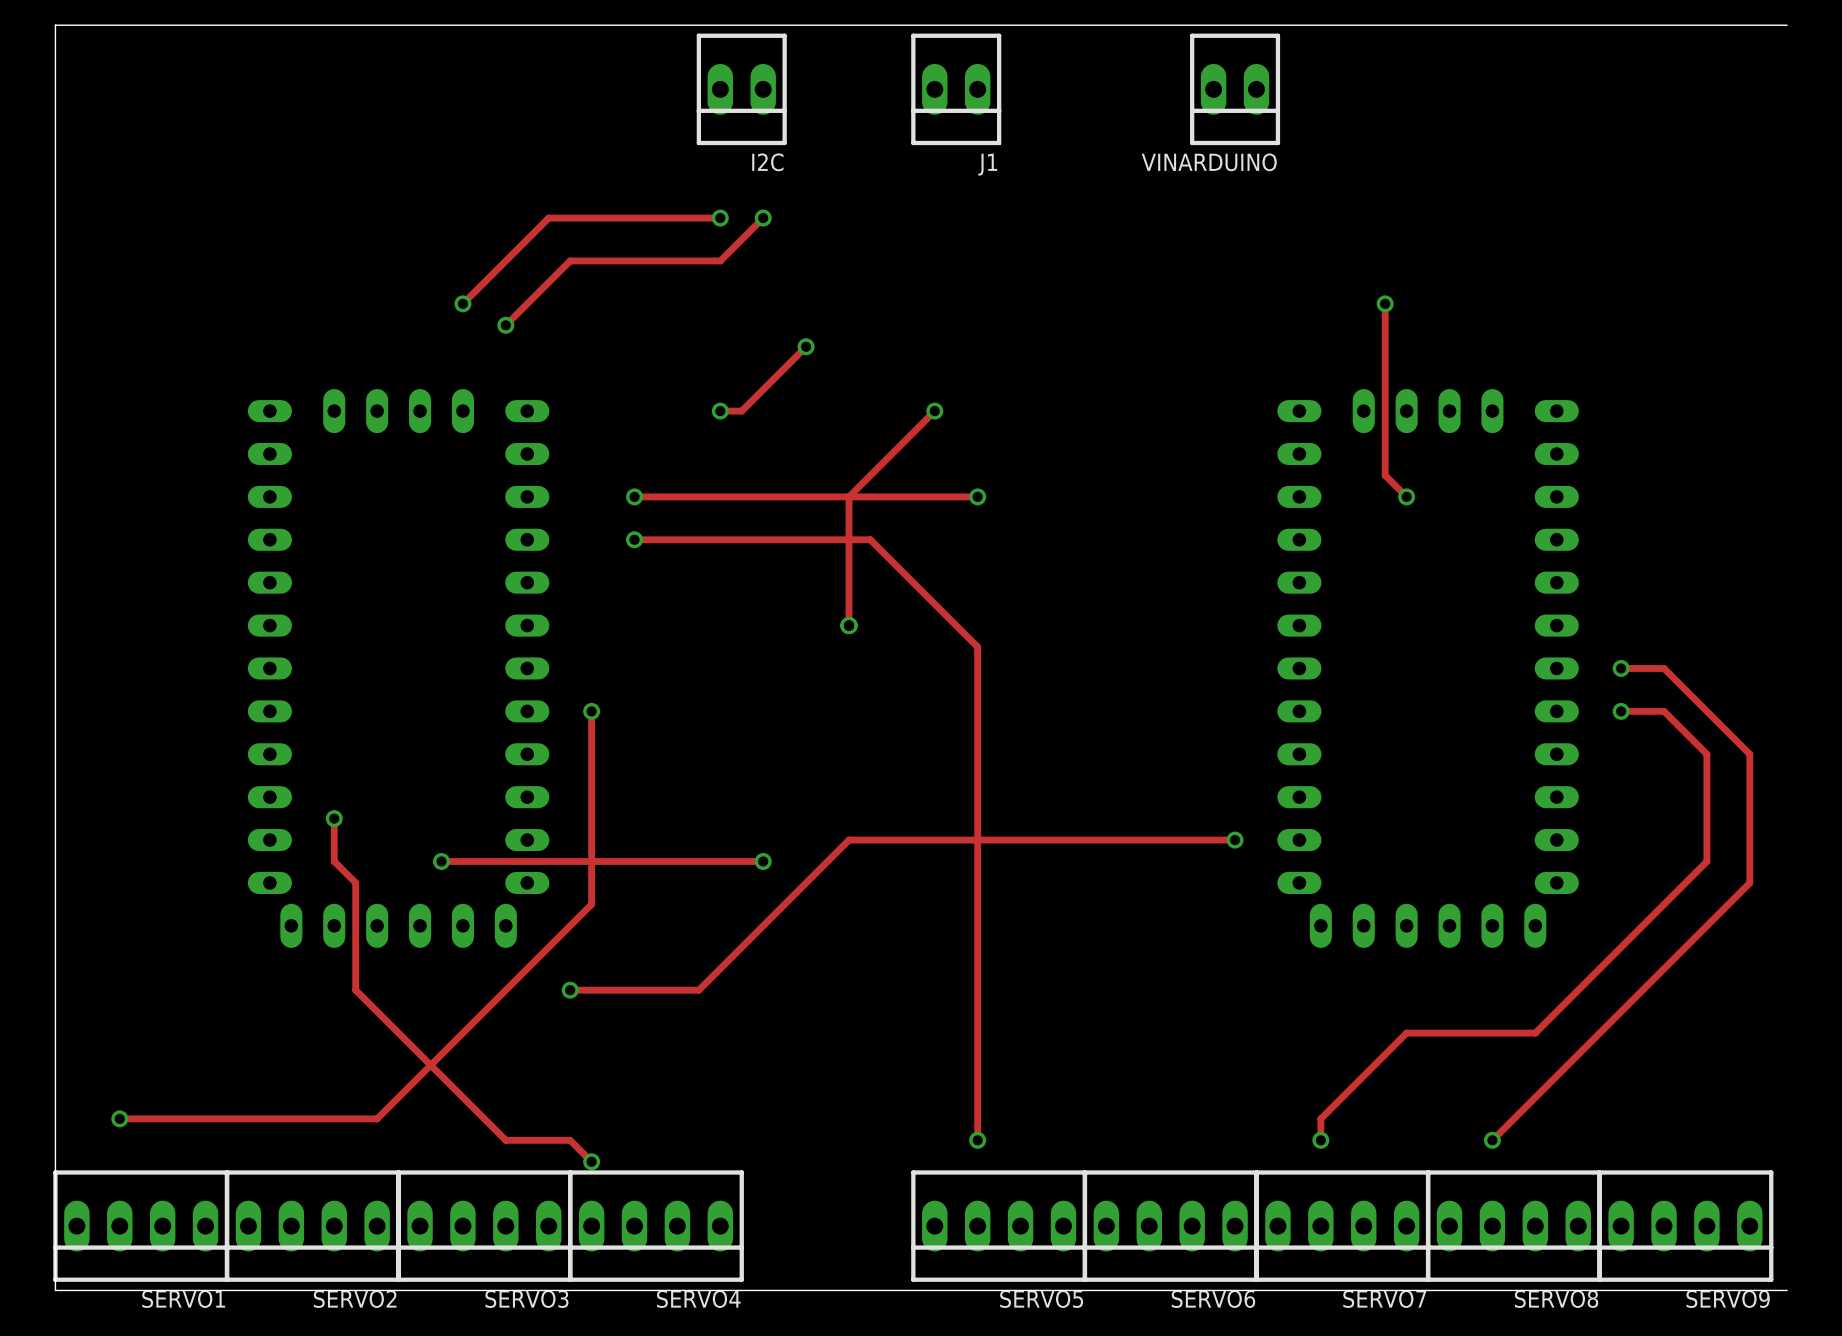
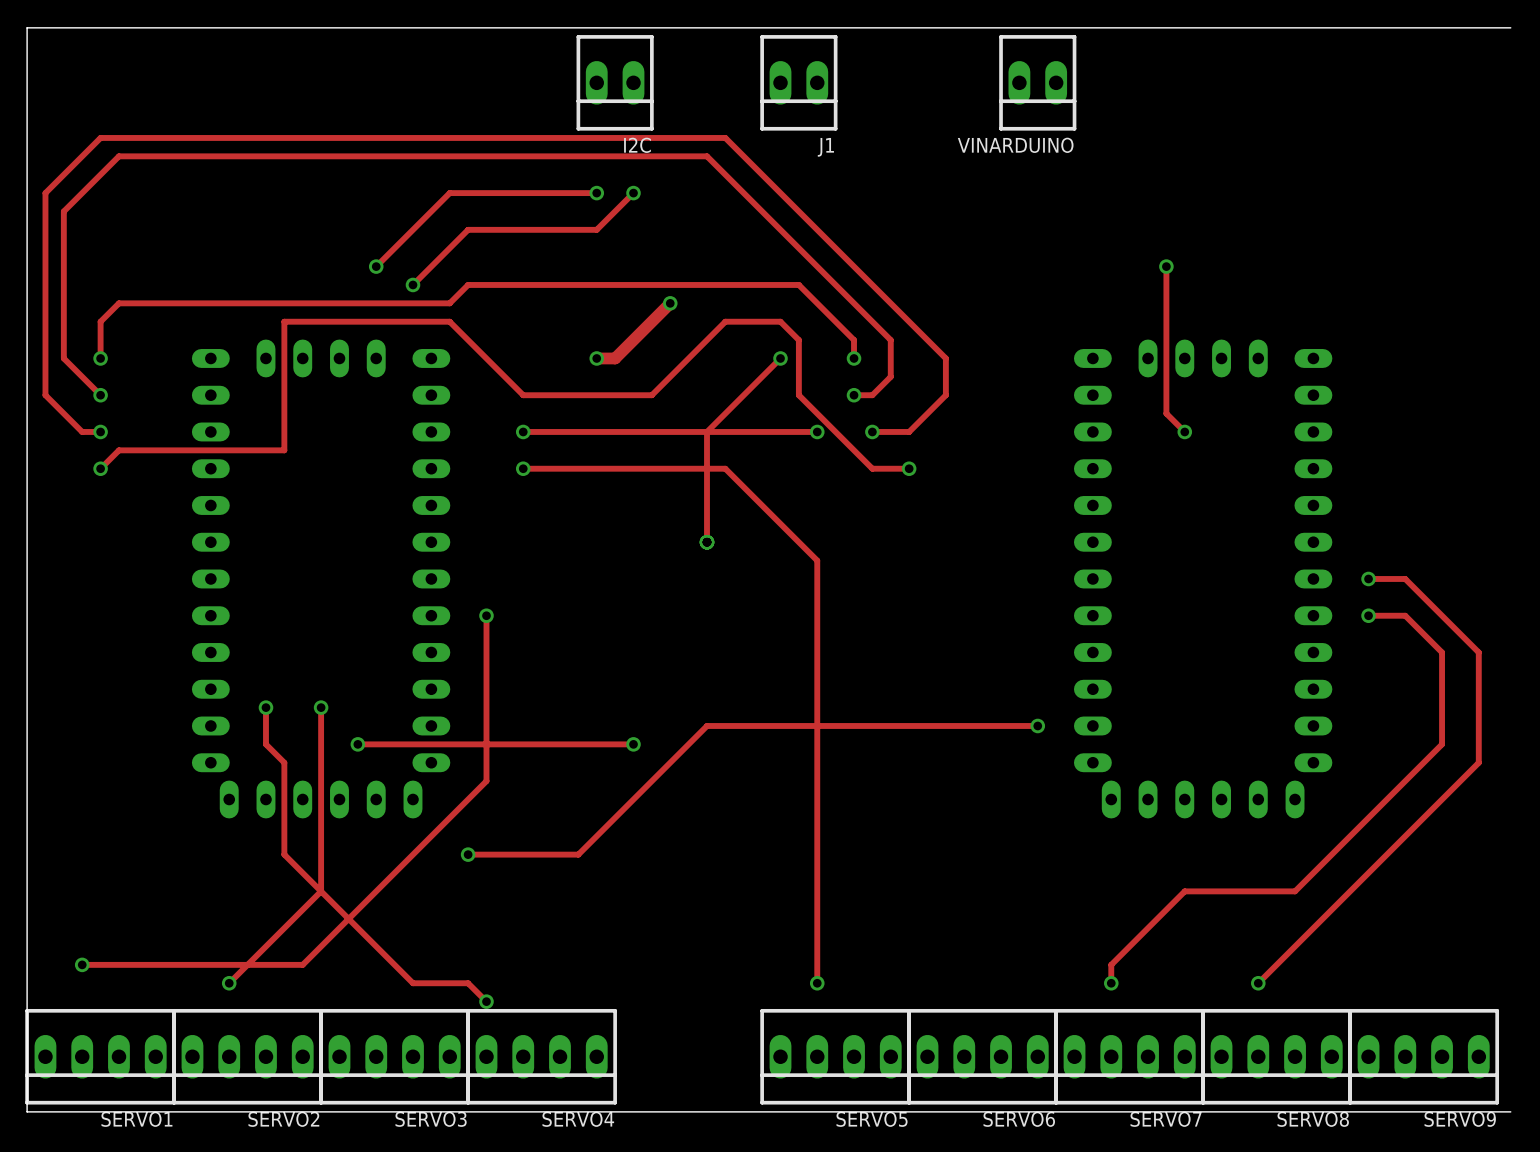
track width: thin (806, 346) (741, 411) (720, 411) -> thick (670, 303) (615, 358) (596, 358)
track: none -> (100, 358) (100, 321) (118, 303) (449, 303) (468, 284) (798, 284) (854, 340) (854, 358)
via: none -> (100, 358)
via: none -> (854, 358)
track: none -> (100, 395) (63, 358) (63, 211) (118, 156) (707, 156) (890, 340) (890, 376) (872, 395) (854, 395)
via: none -> (100, 395)
via: none -> (854, 395)
track: none -> (100, 431) (82, 431) (45, 395) (45, 193) (100, 137) (725, 137) (945, 358) (945, 395) (909, 431) (872, 431)
via: none -> (100, 431)
via: none -> (872, 431)
track: none -> (100, 468) (118, 450) (284, 450) (284, 321) (449, 321) (523, 395) (651, 395) (725, 321) (780, 321) (798, 340) (798, 395) (872, 468) (909, 468)
via: none -> (100, 468)
via: none -> (909, 468)
track: none -> (321, 707) (321, 891) (229, 983)
via: none -> (321, 707)
via: none -> (229, 983)

